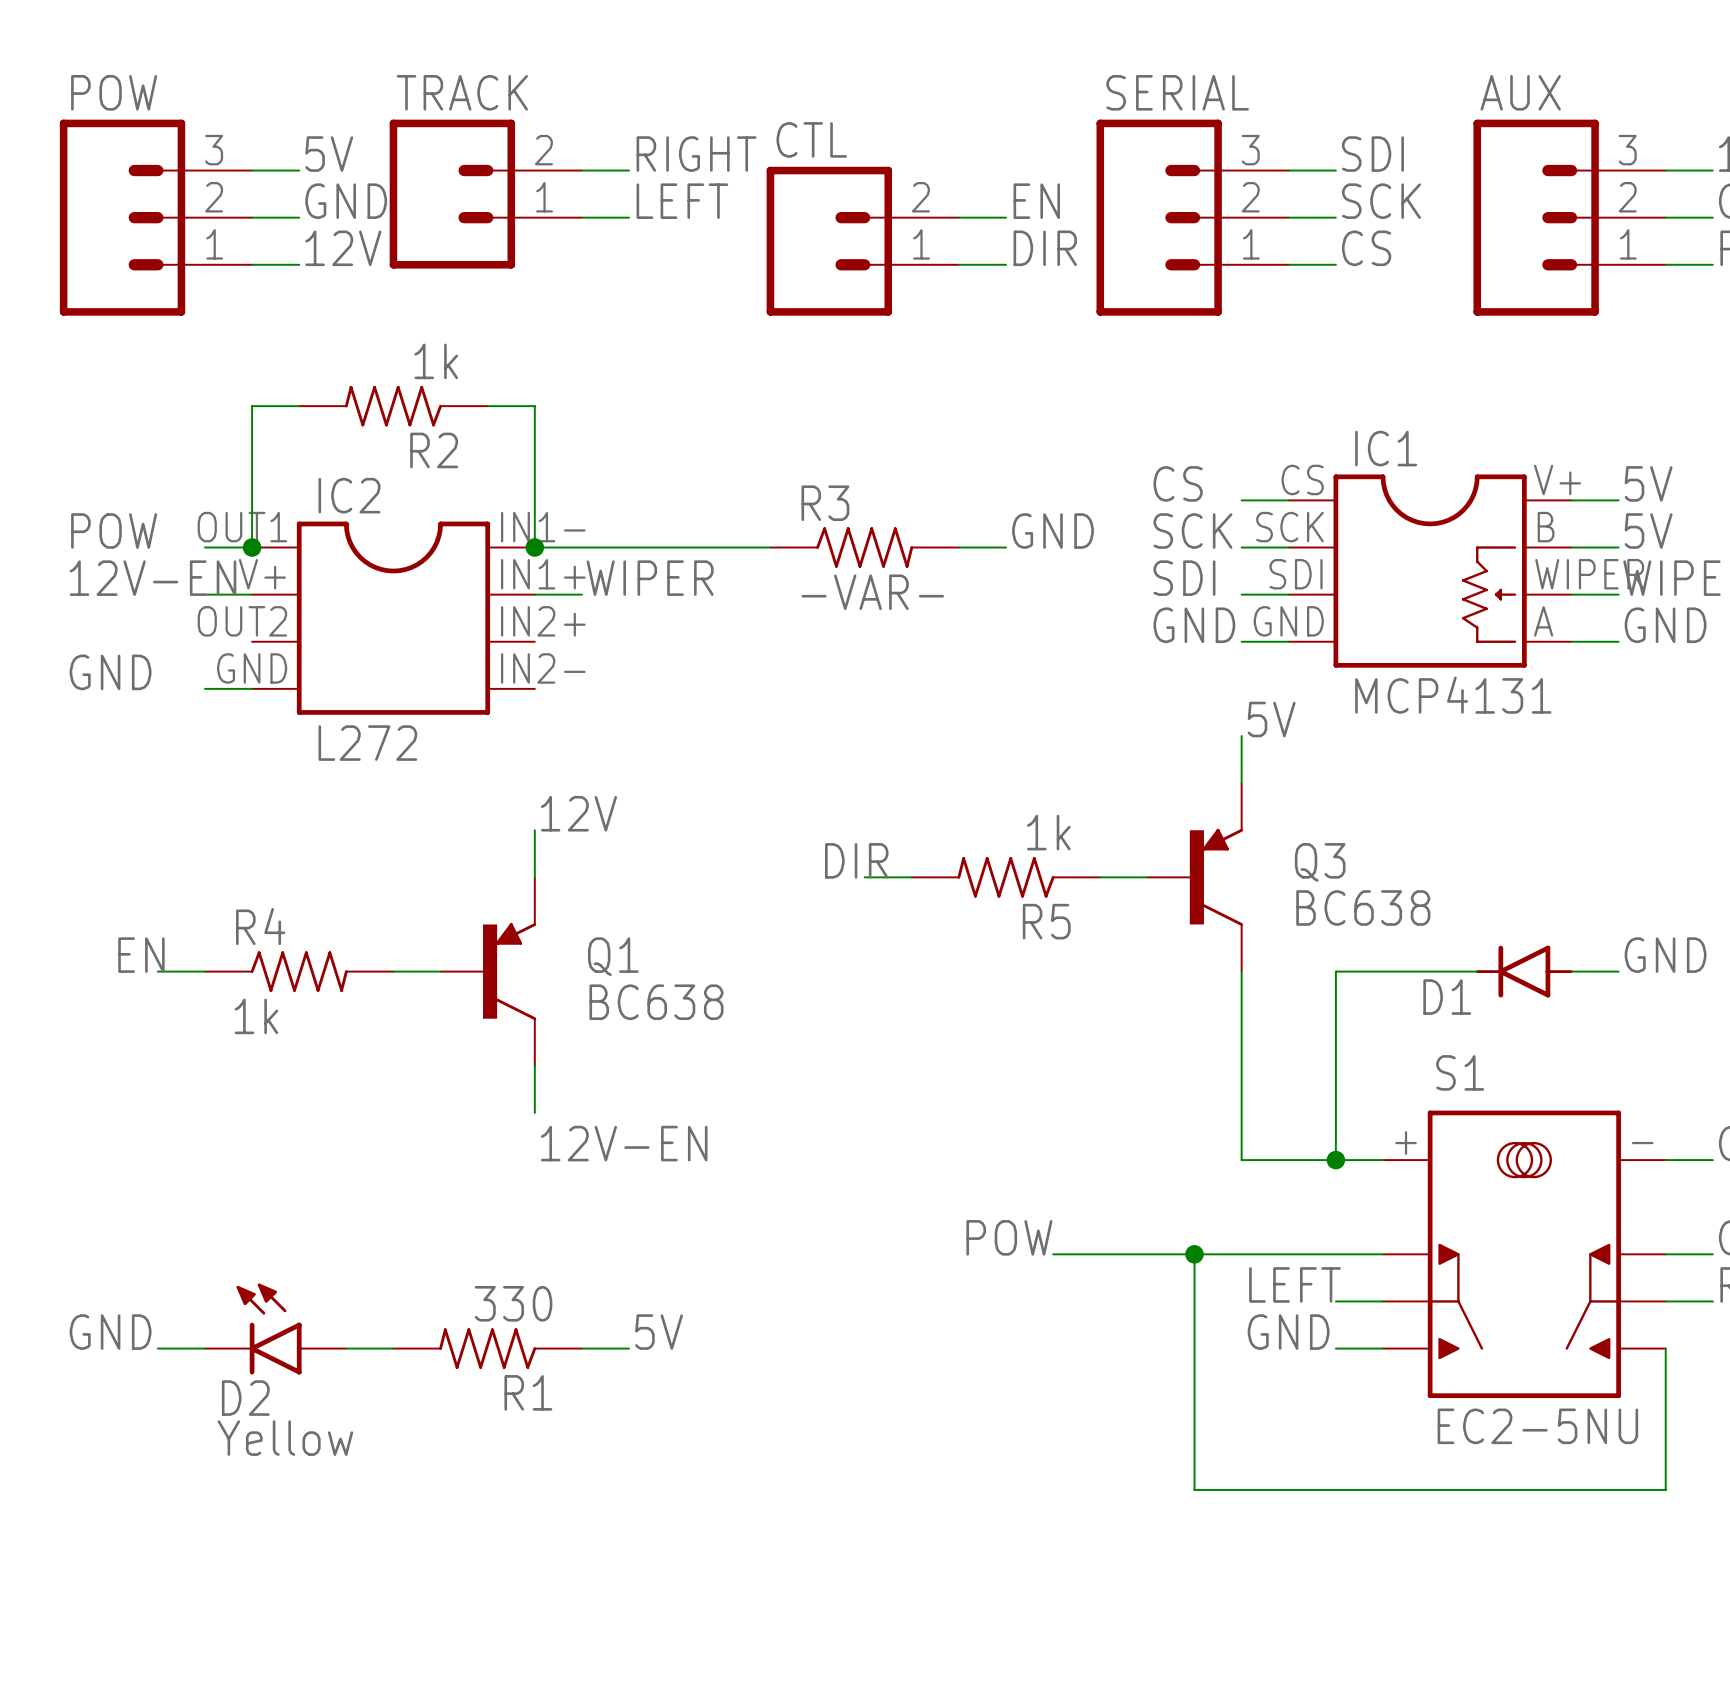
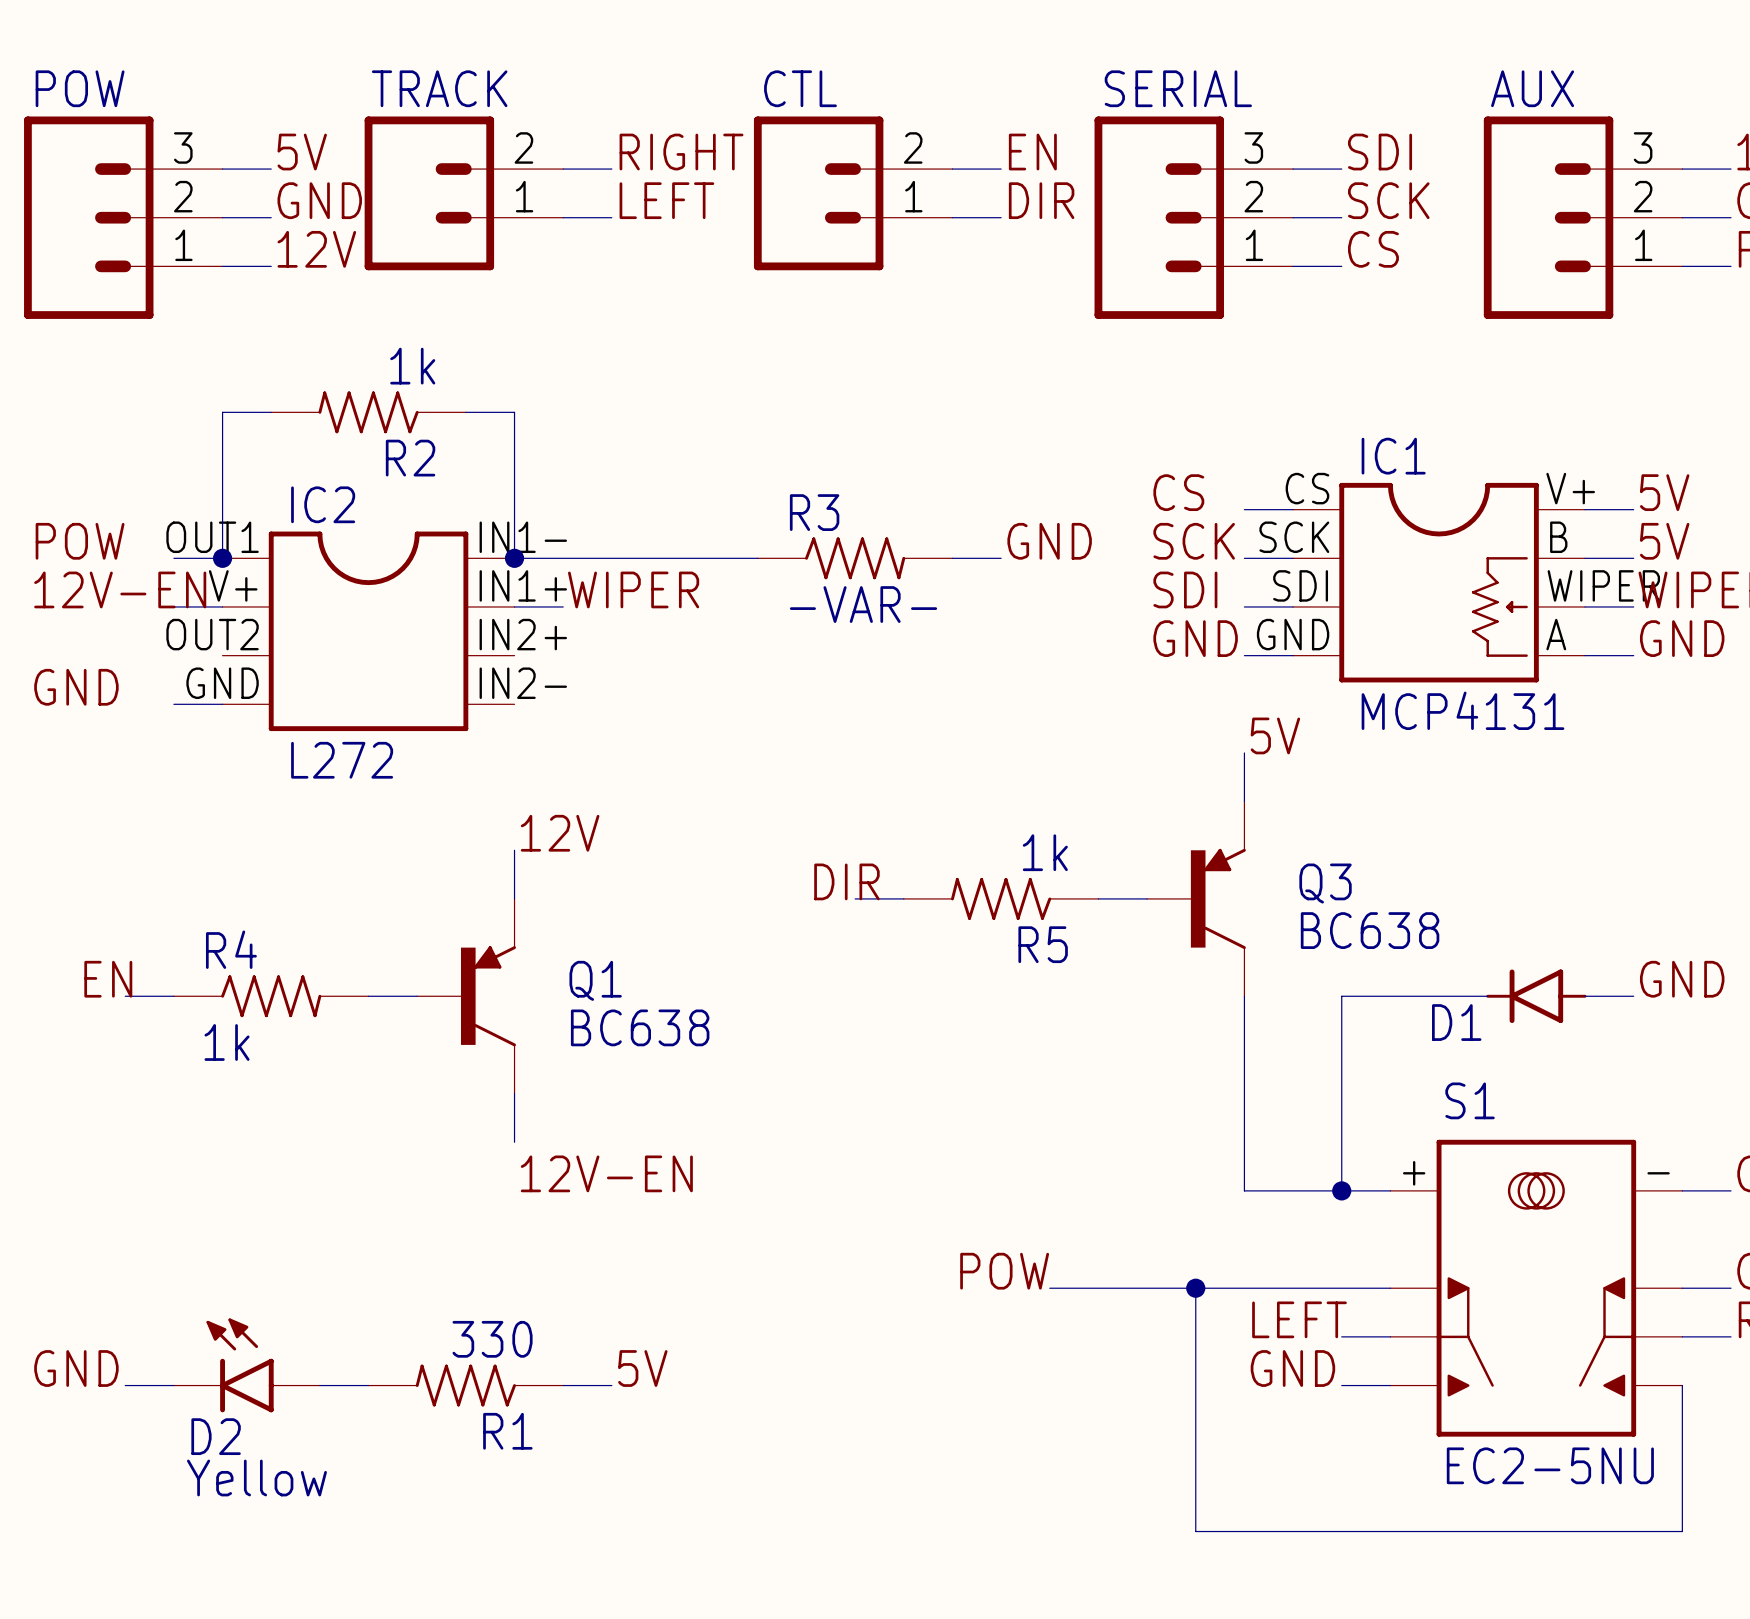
label: none -> EN (1032, 152)
label: EN (1036, 201) -> DIR (1041, 200)
CTL position: (862, 241) -> (853, 193)
label: DIR (1045, 248) -> none
wire: (958, 264) (1006, 264) -> (952, 169) (1001, 169)

